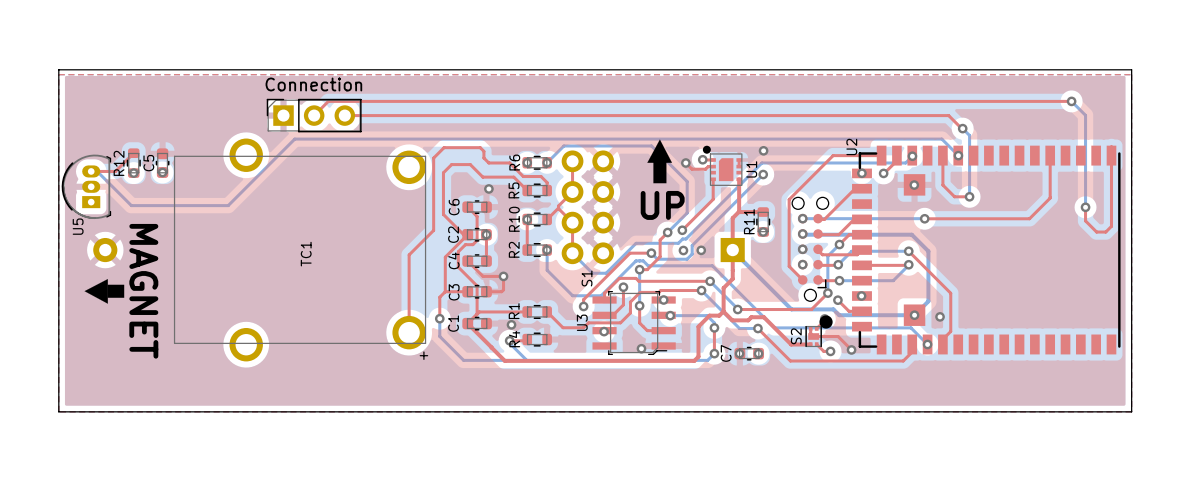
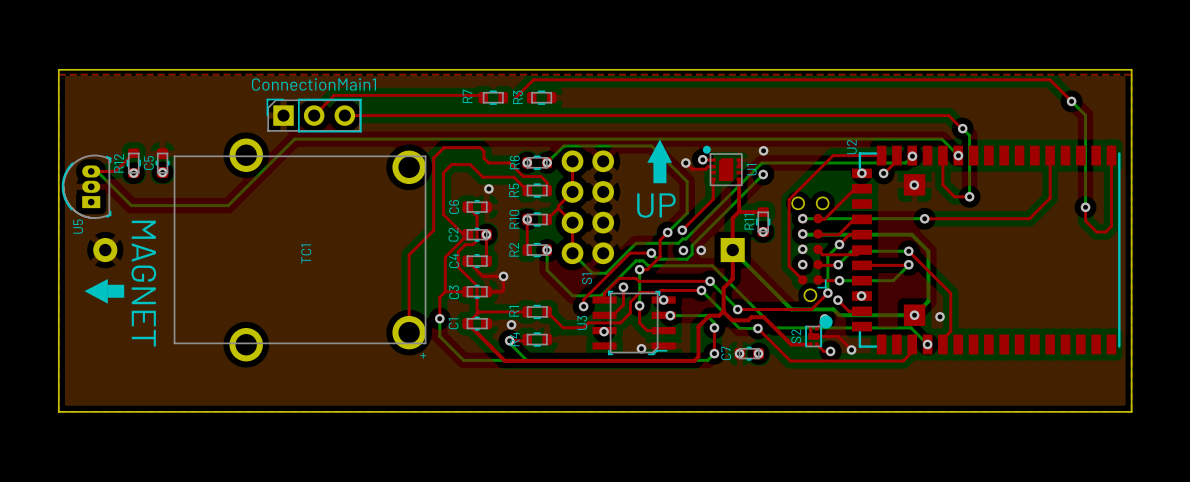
Connection name: Connection (313, 84) -> ConnectionMain1 (313, 84)
top track: none -> (483, 97) (481, 95) (333, 95) (328, 101)
R7: none -> (493, 97)
R3: none -> (541, 97)
top track: (328, 101) (1071, 101) -> (515, 97) (533, 79) (1050, 79) (1071, 101)

